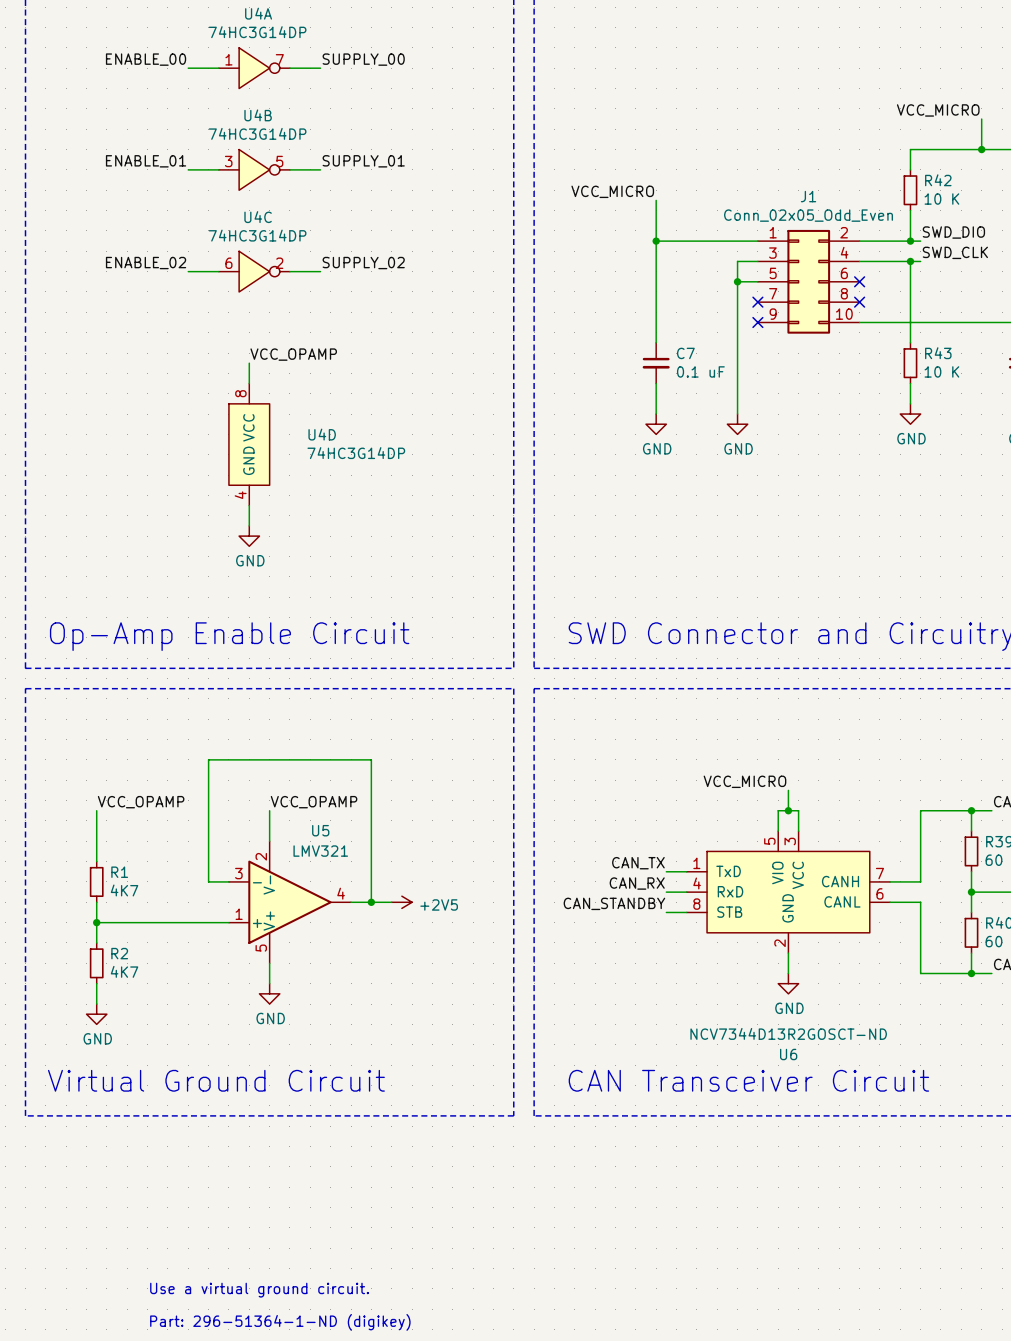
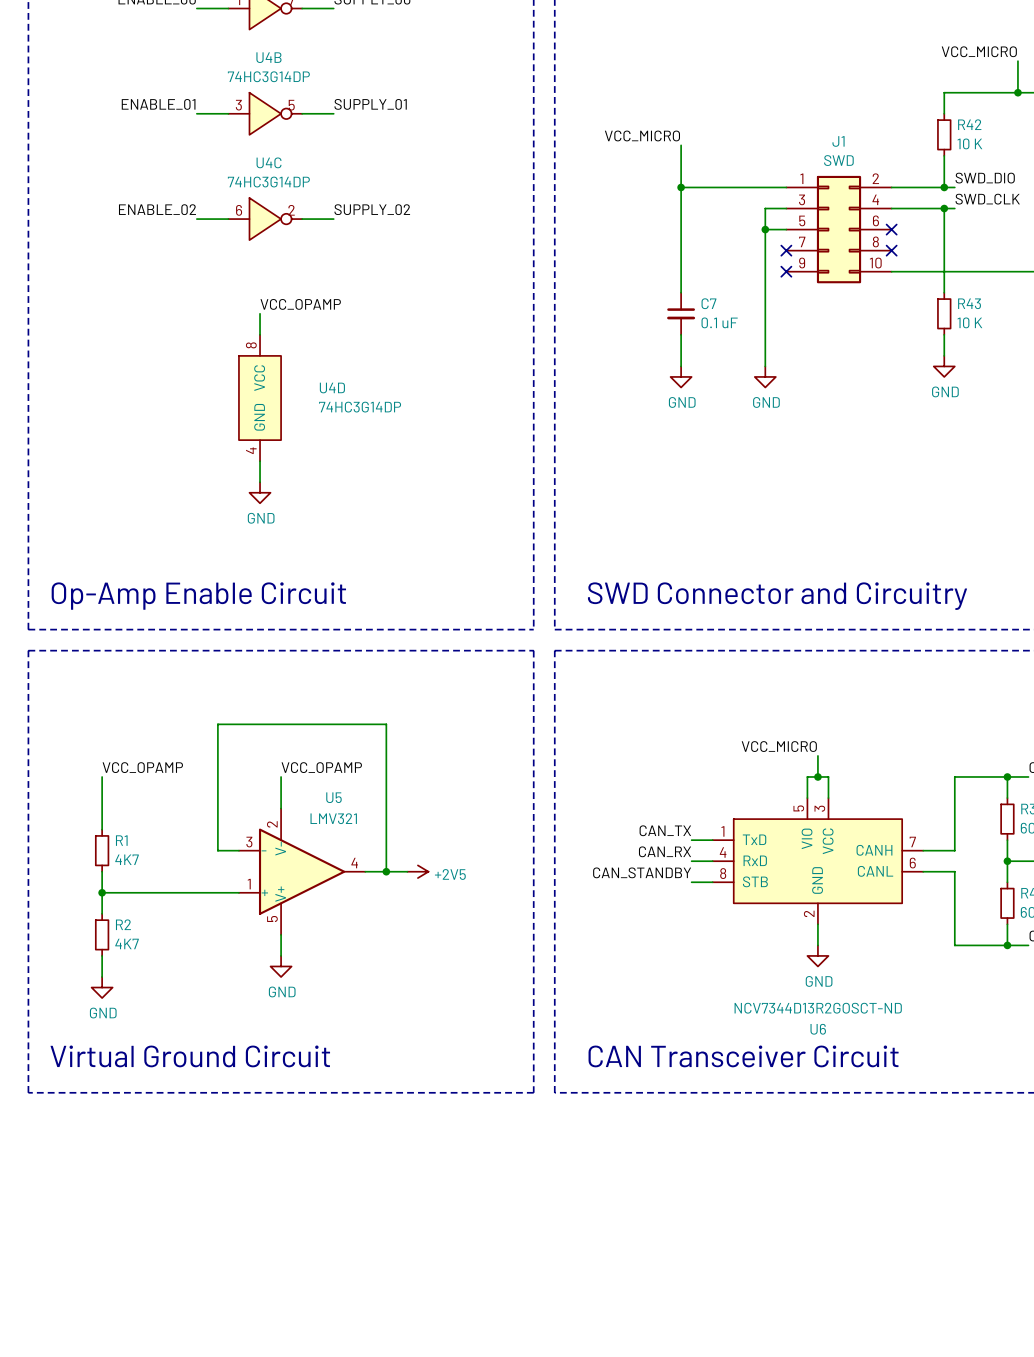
J1 value: Conn_02x05_Odd_Even (808, 215) -> SWD (838, 160)
text: Use a virtual ground circuit. (259, 1290) -> none
text: Part: 296-51364-1-ND (digikey) (280, 1322) -> none

